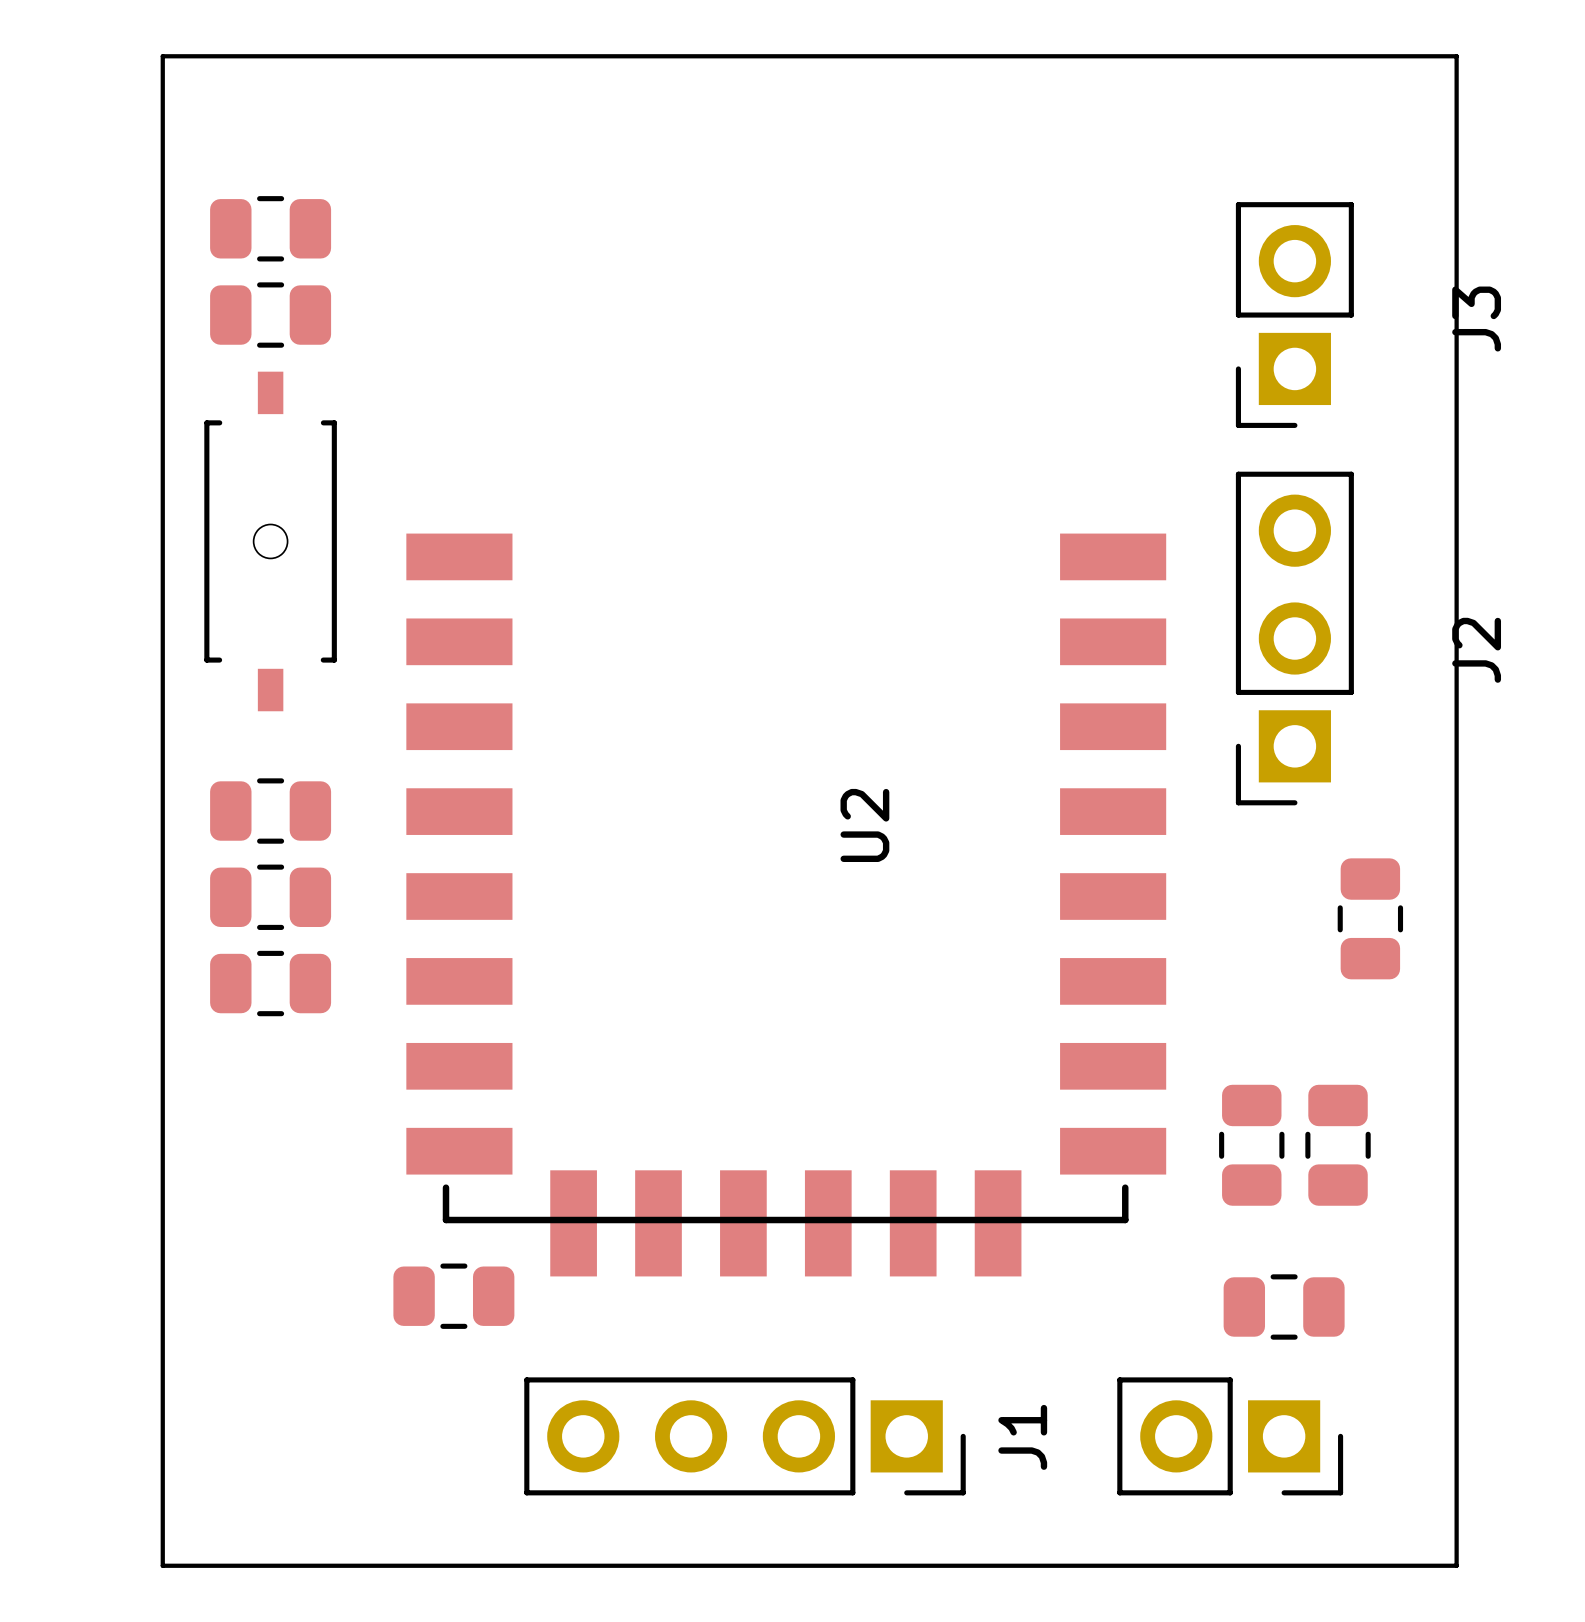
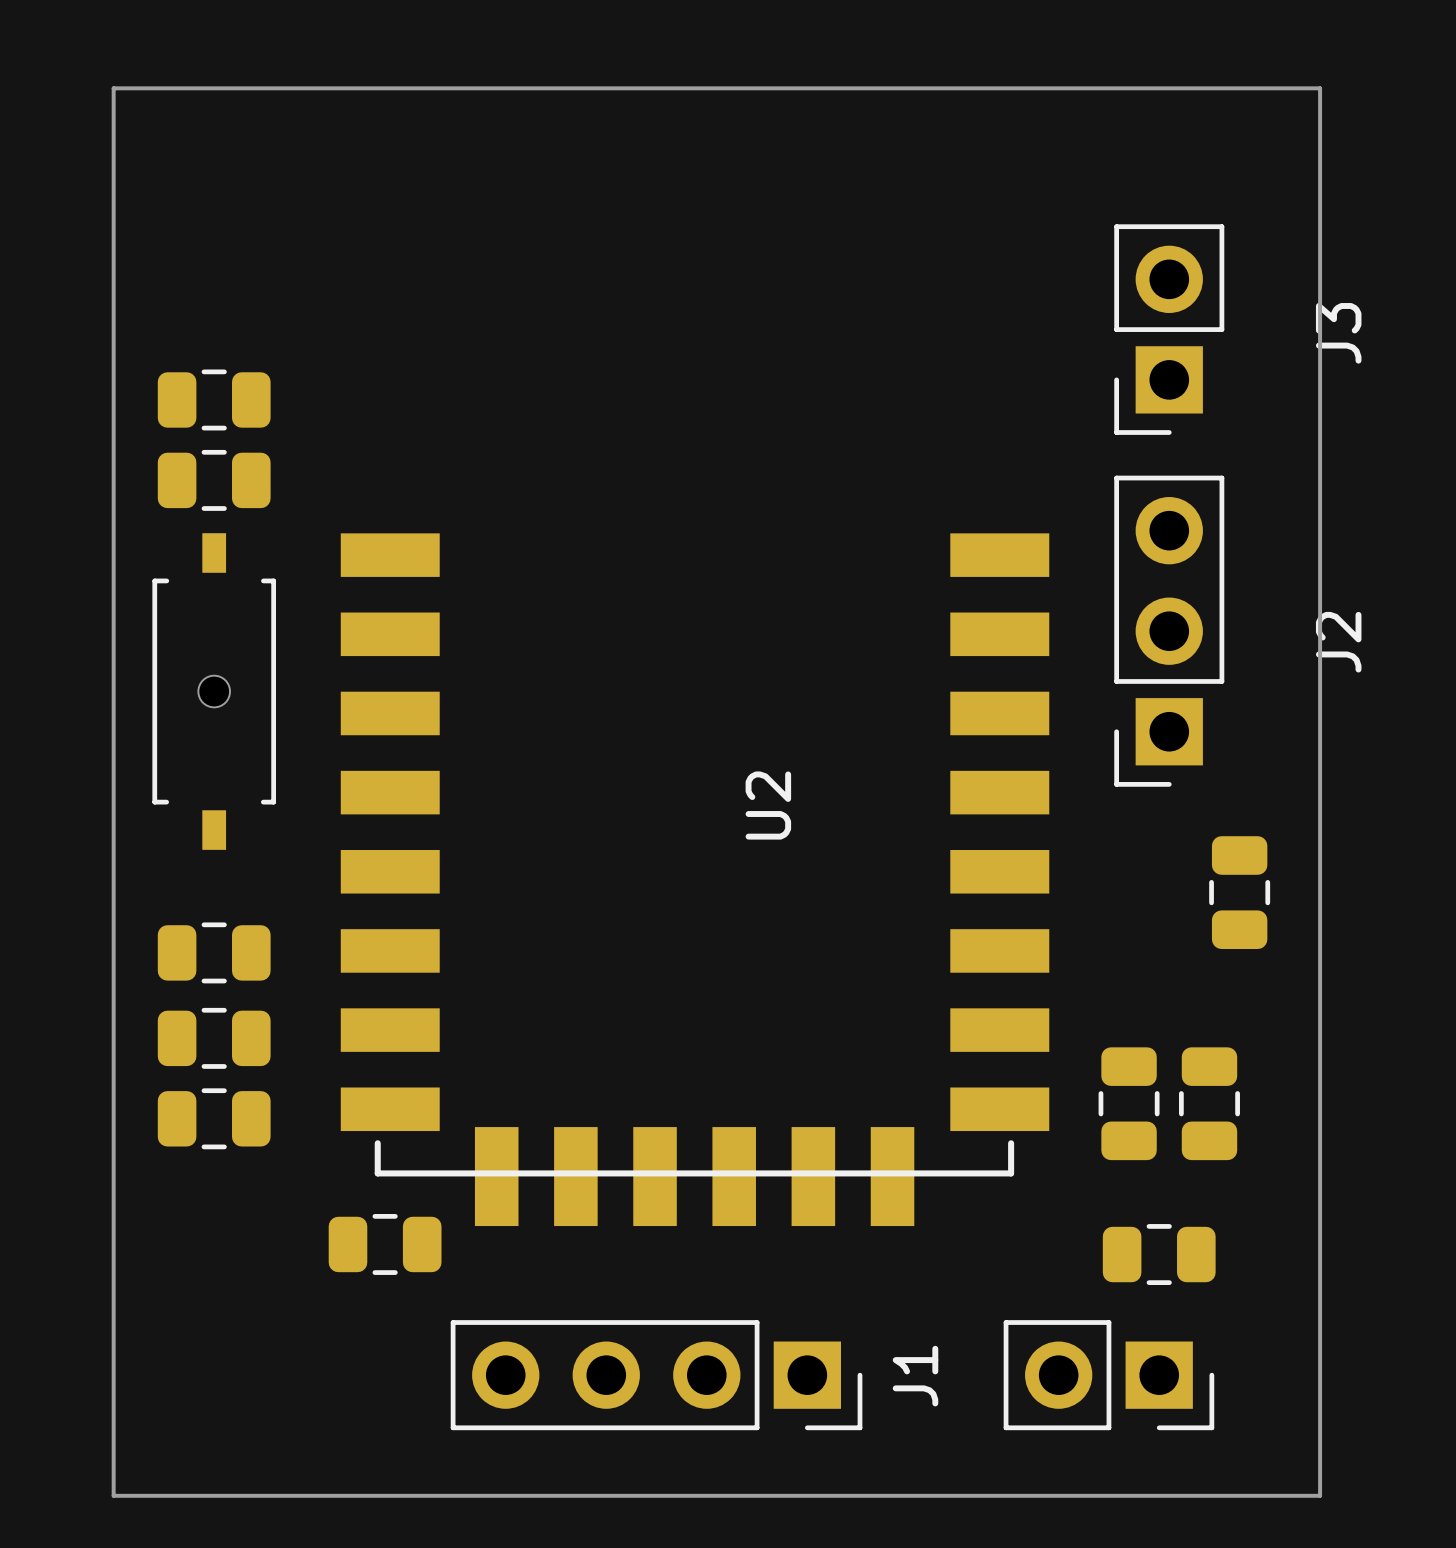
part: (270, 228) -> none
part position: (270, 315) -> (214, 399)
part: none -> (214, 480)
part position: (270, 541) -> (214, 691)
part: (270, 811) -> none
part: (270, 897) -> none
part: none -> (214, 1038)
part: none -> (214, 1118)

